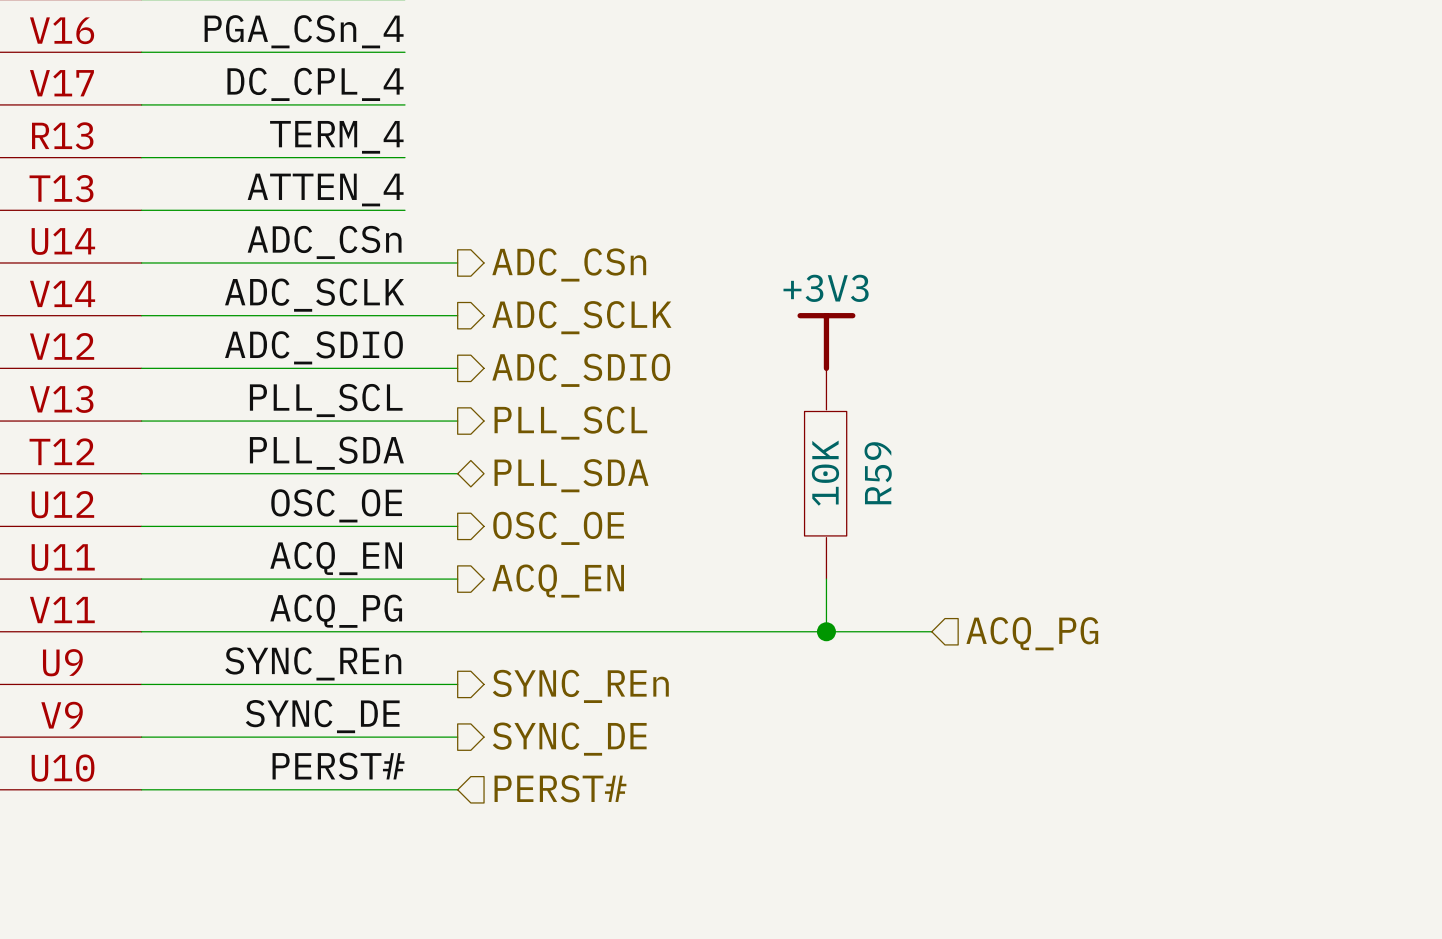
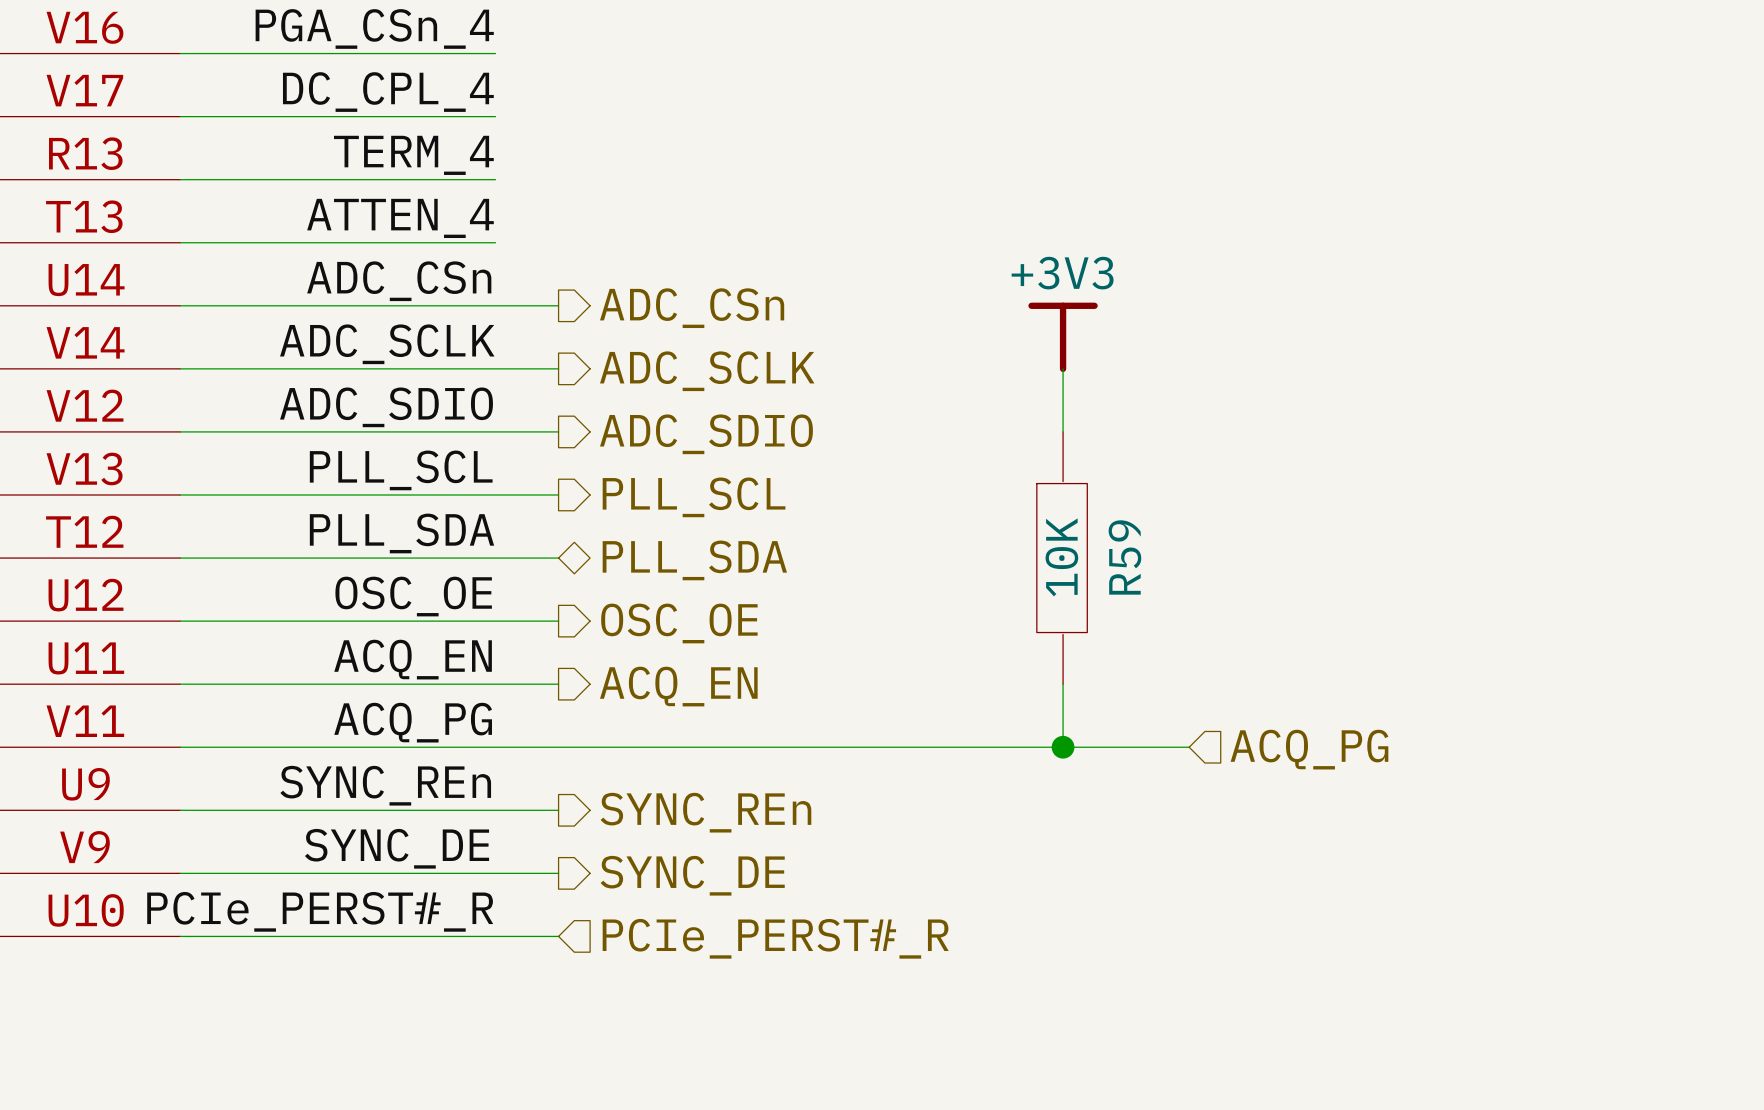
wire: none -> (1063, 368) (1063, 431)
power symbol position: +3V3 (826, 342) -> +3V3 (1063, 337)
R59 position: (825, 473) -> (1062, 558)
wire: (826, 579) (826, 631) -> (1063, 684) (1063, 747)
junction position: (826, 631) -> (1063, 747)
wire: none -> (1126, 747) (1189, 747)
hierarchical label position: ACQ_PG (1032, 633) -> ACQ_PG (1309, 749)
label: PERST# (338, 766) -> PCIe_PERST#_R (320, 911)
hierarchical label: PERST# (560, 788) -> PCIe_PERST#_R (775, 938)

